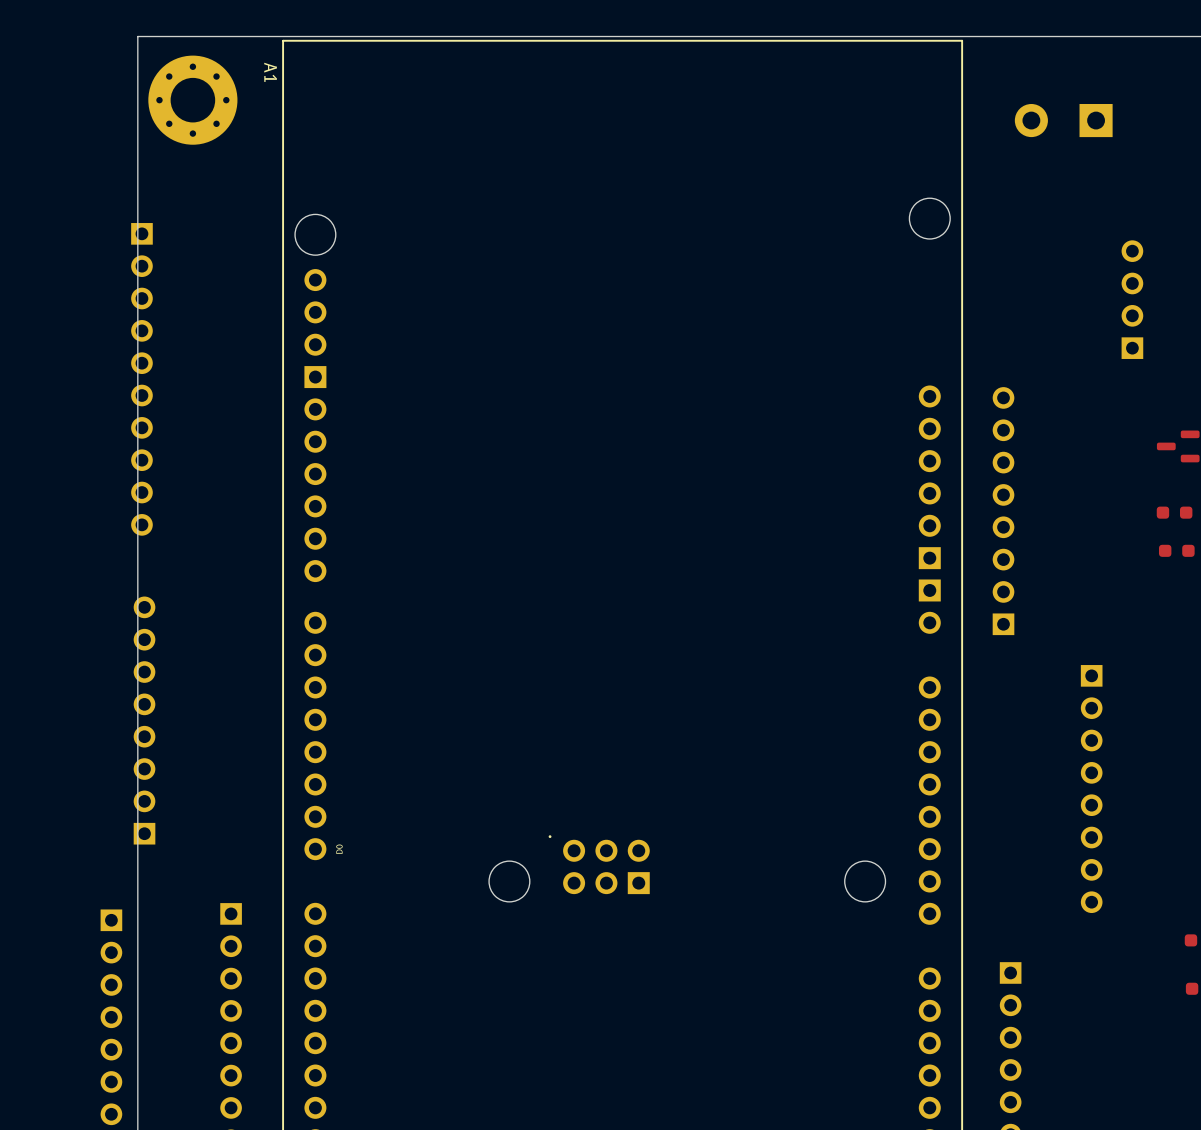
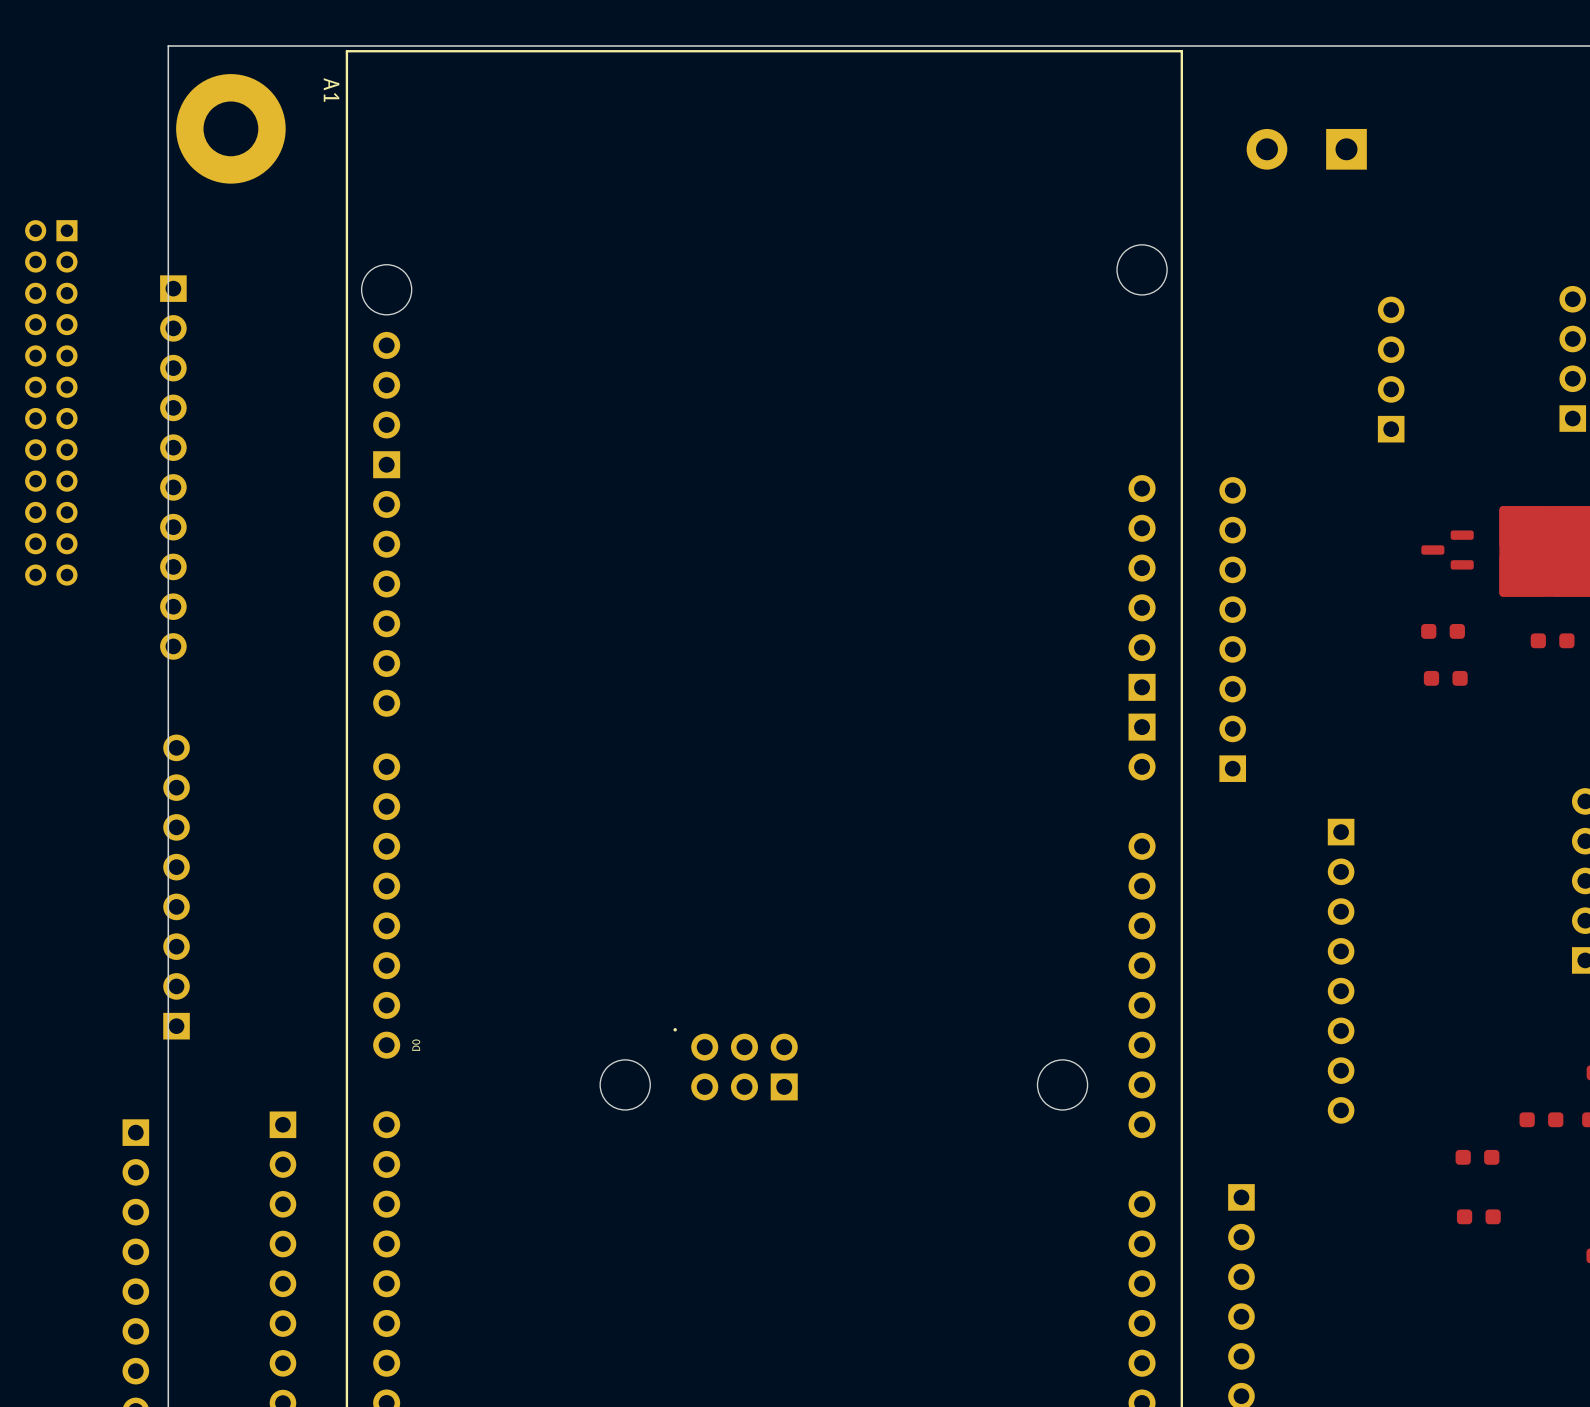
part footprint: [148, 55, 238, 145] -> [176, 74, 286, 184]
part: none -> (51, 402)

